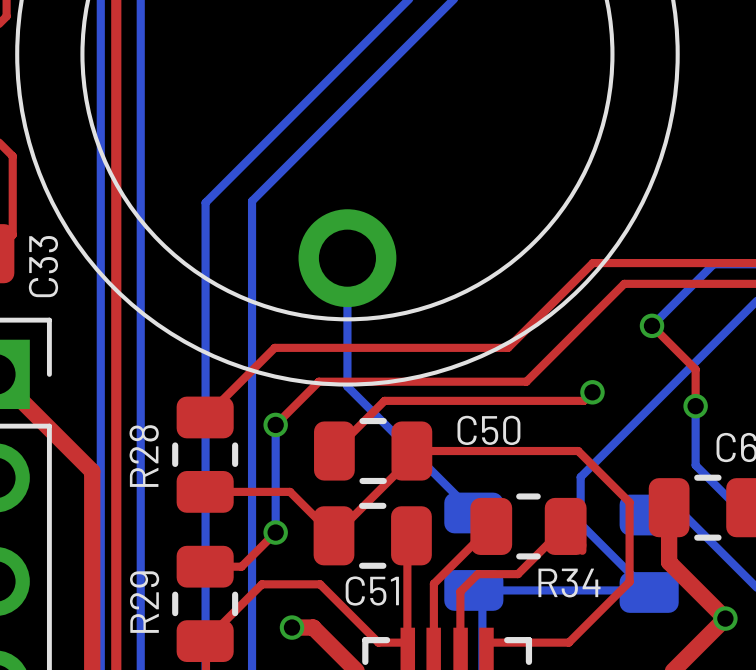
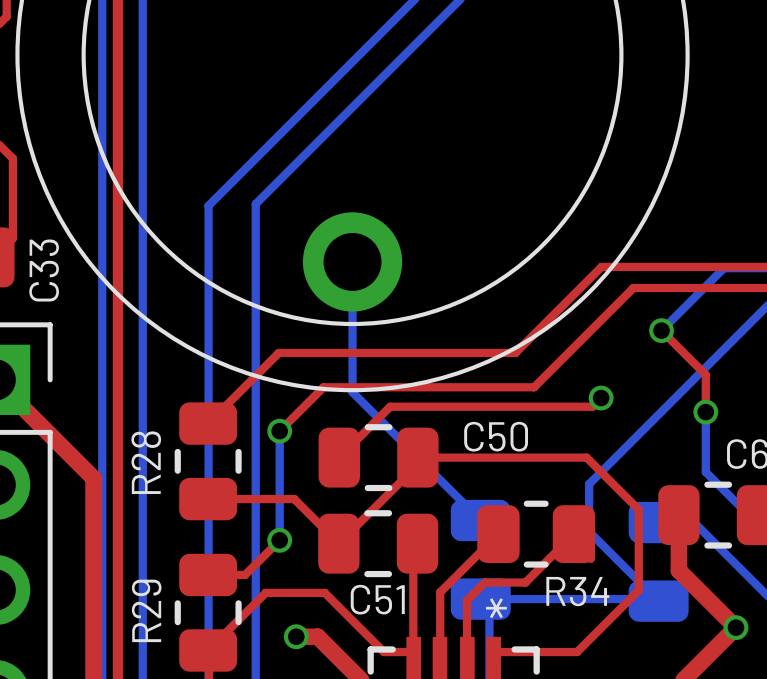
part text: none -> * (496, 608)

